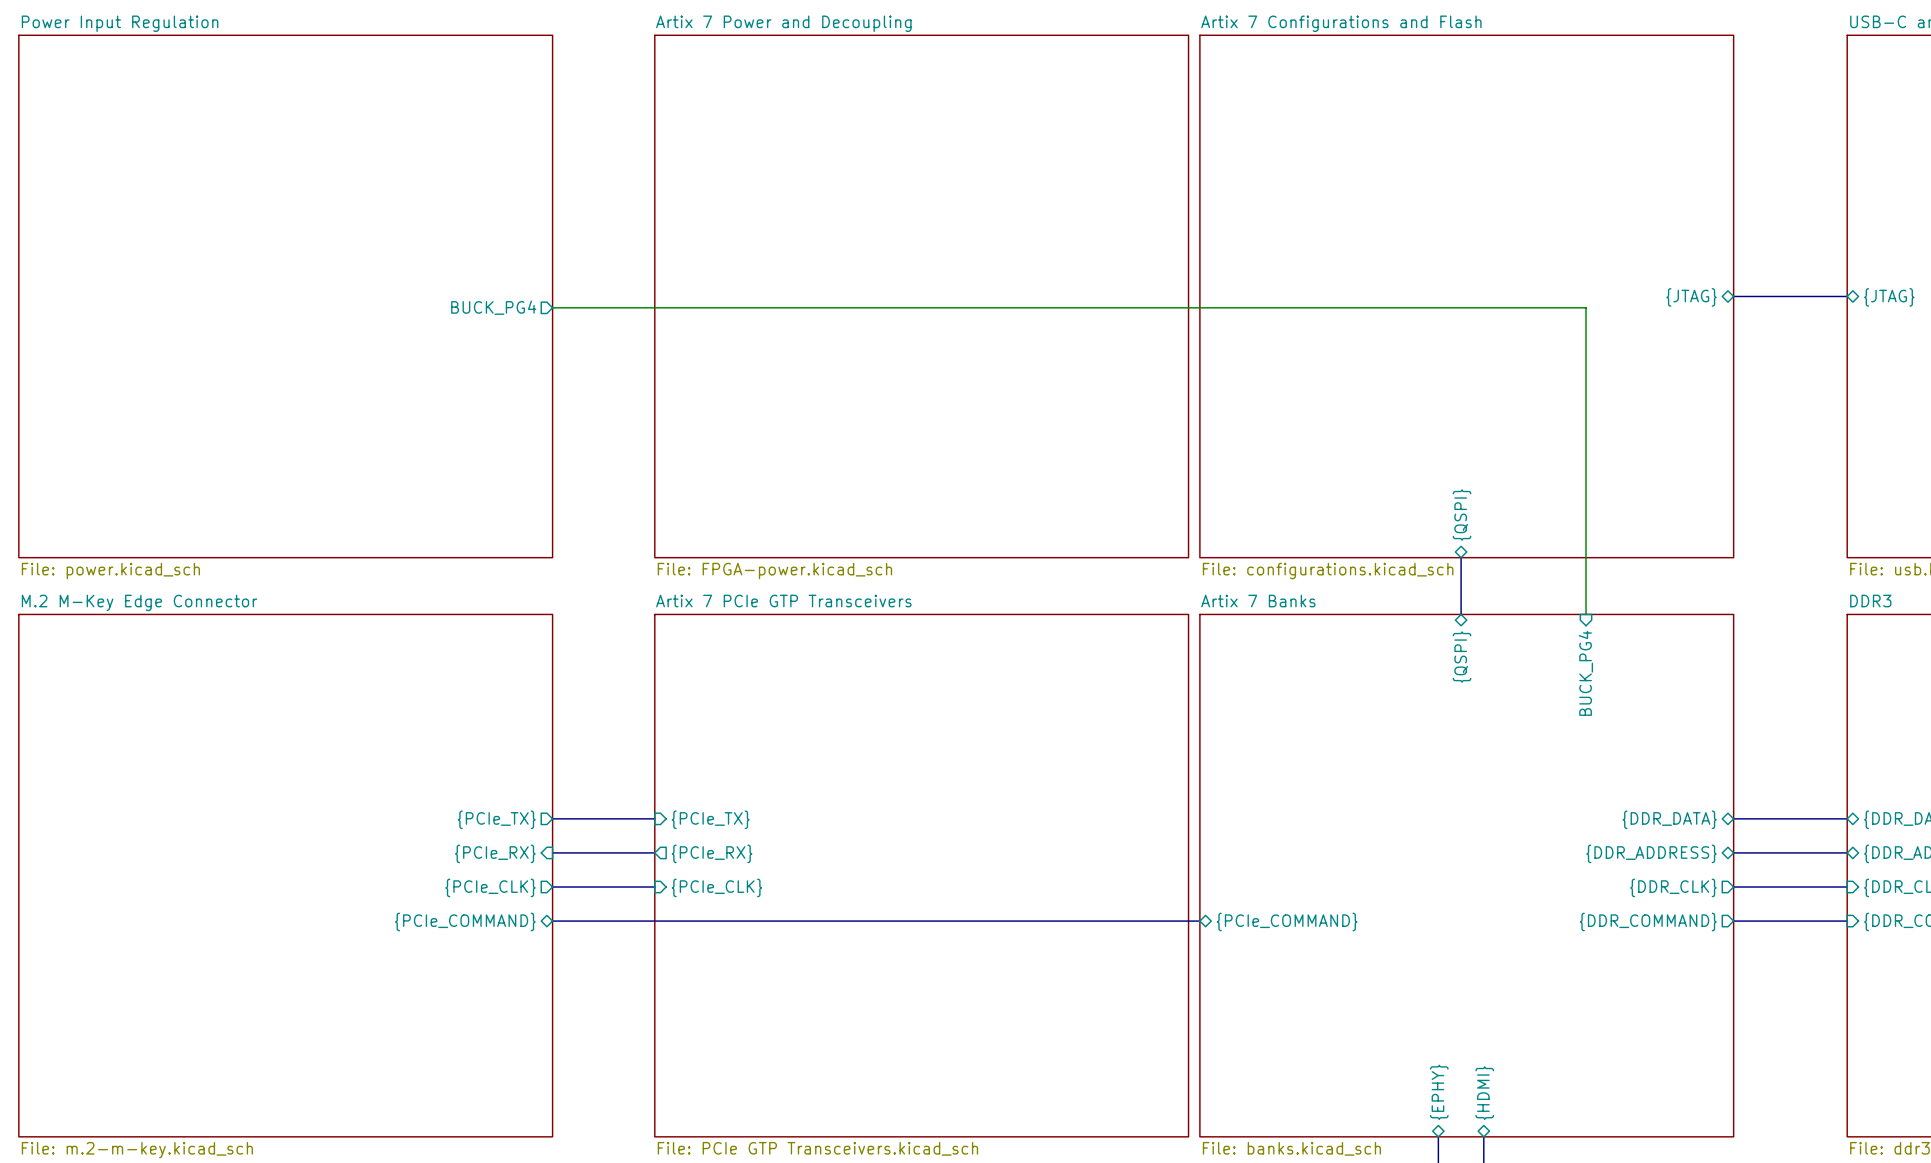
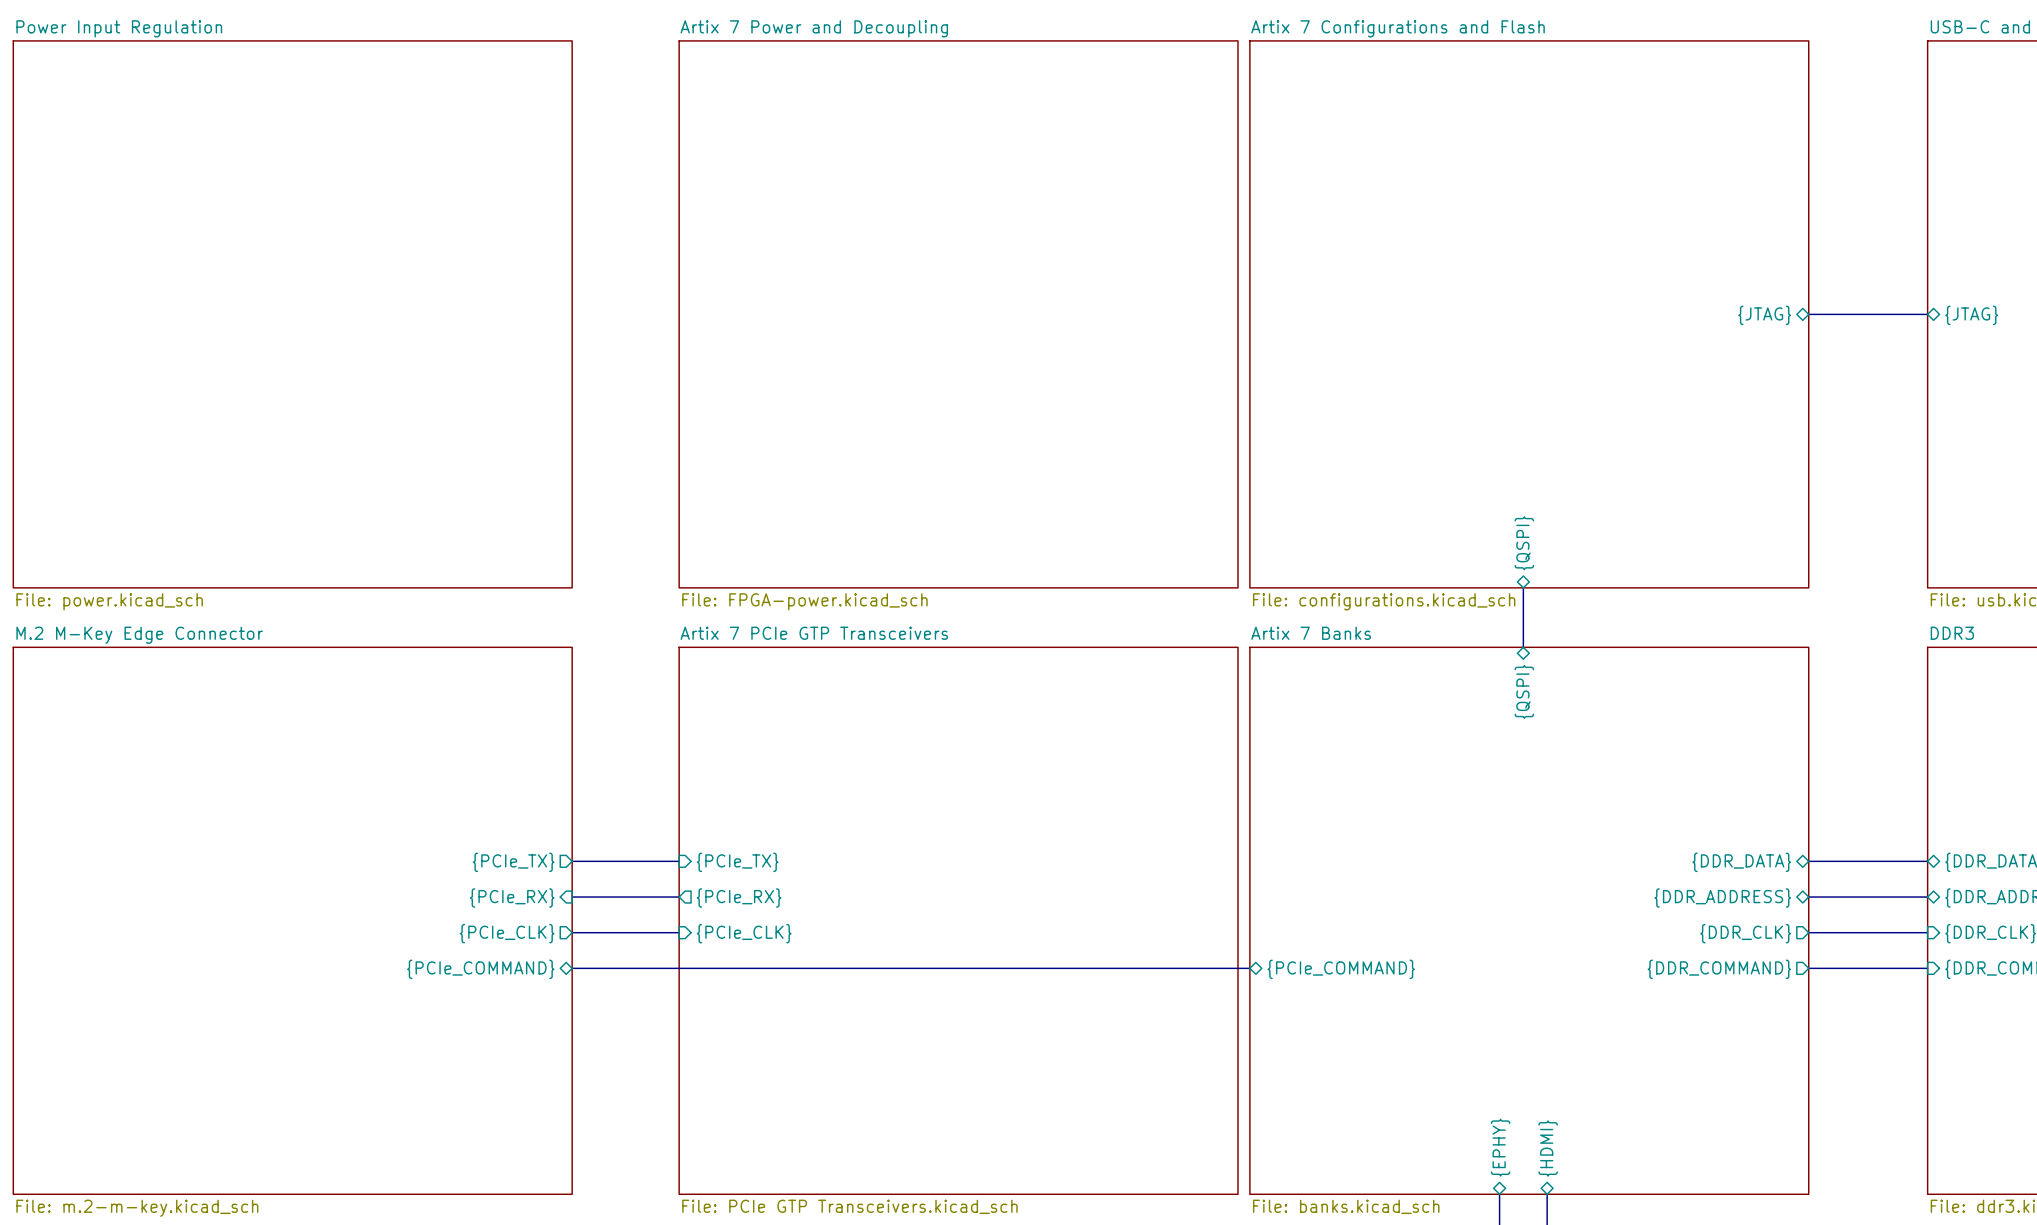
sheet pin: BUCK_PG4 (493, 307) -> none
wire: (552, 307) (1586, 307) (1586, 614) -> none
sheet pin: BUCK_PG4 (1585, 673) -> none

